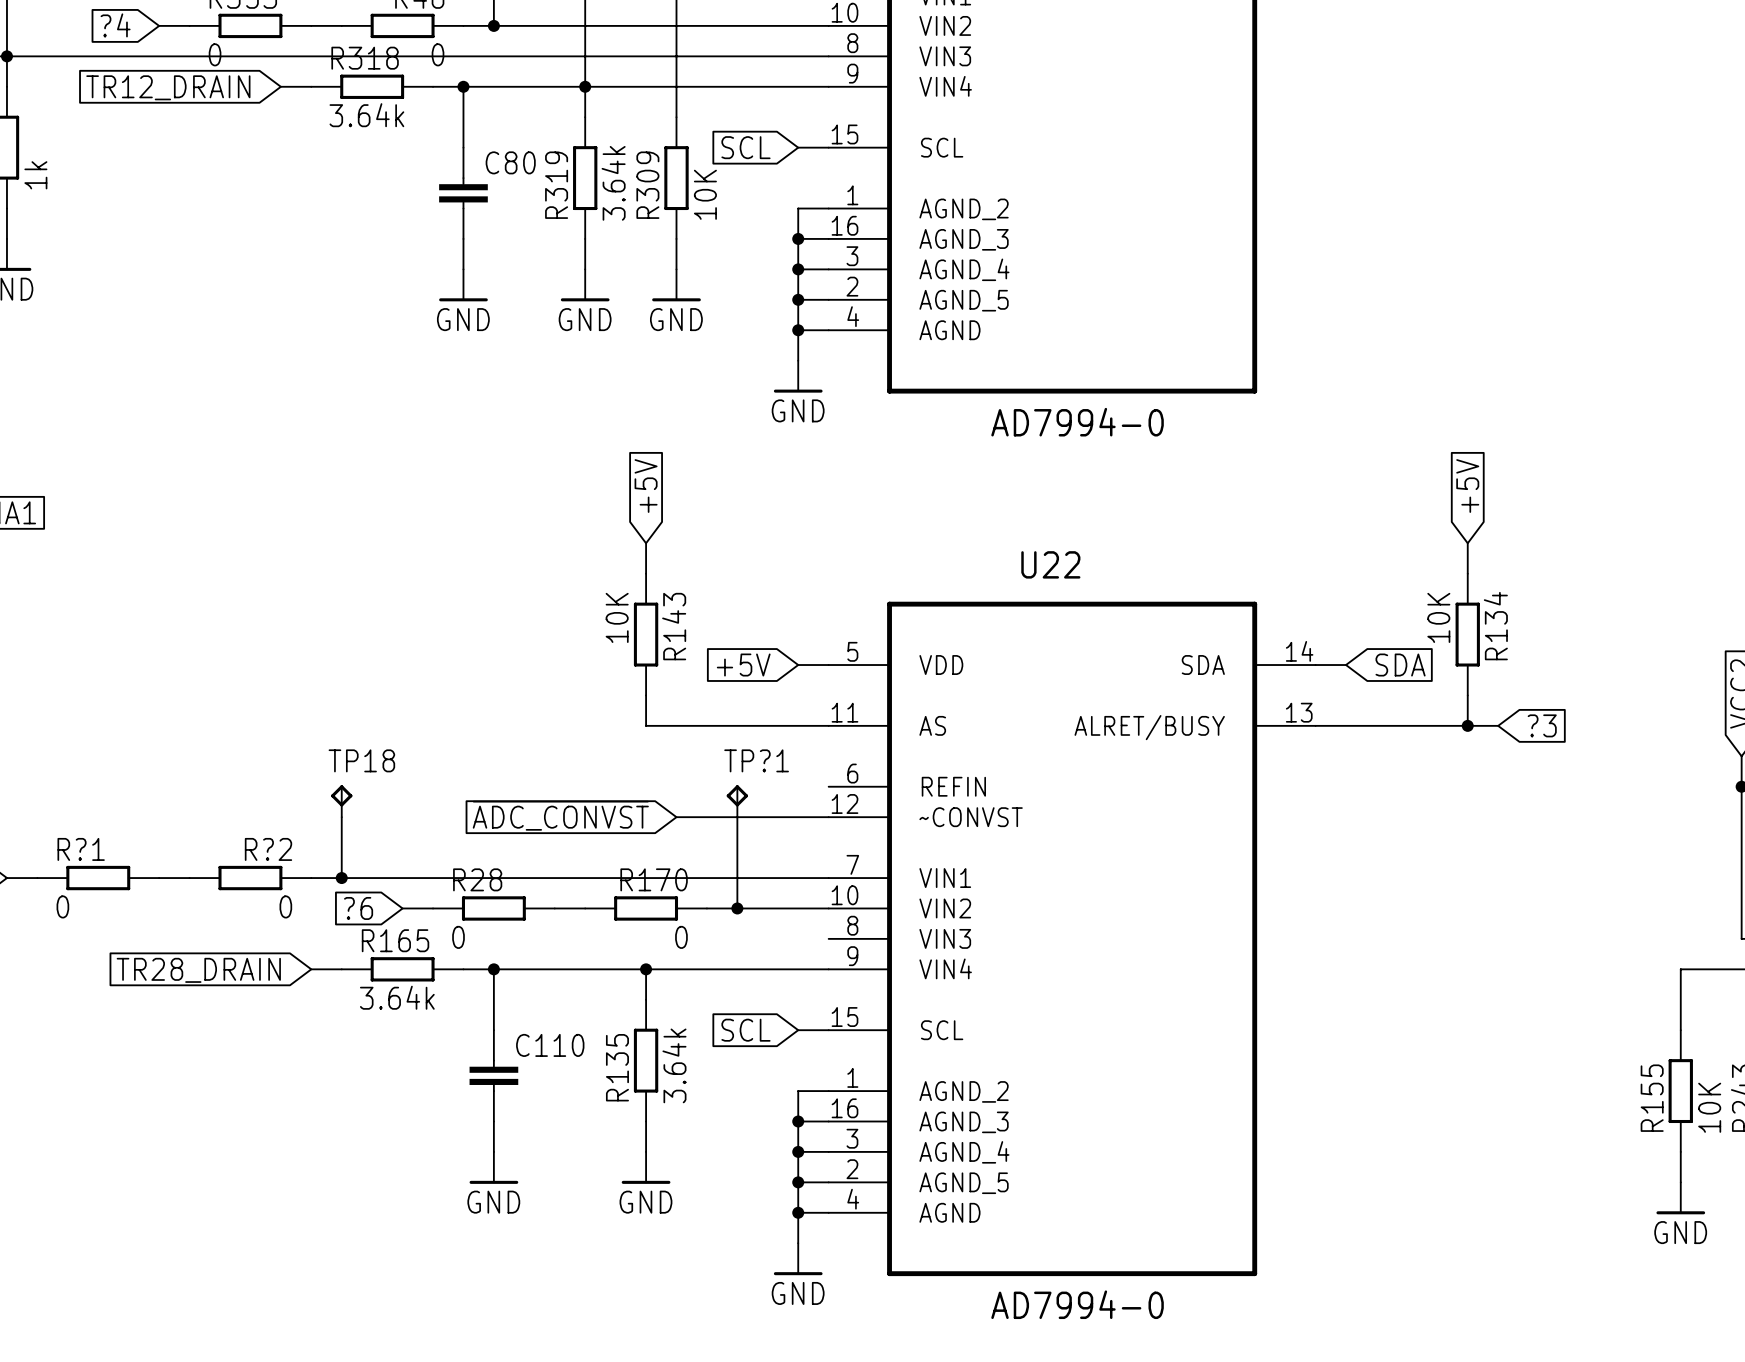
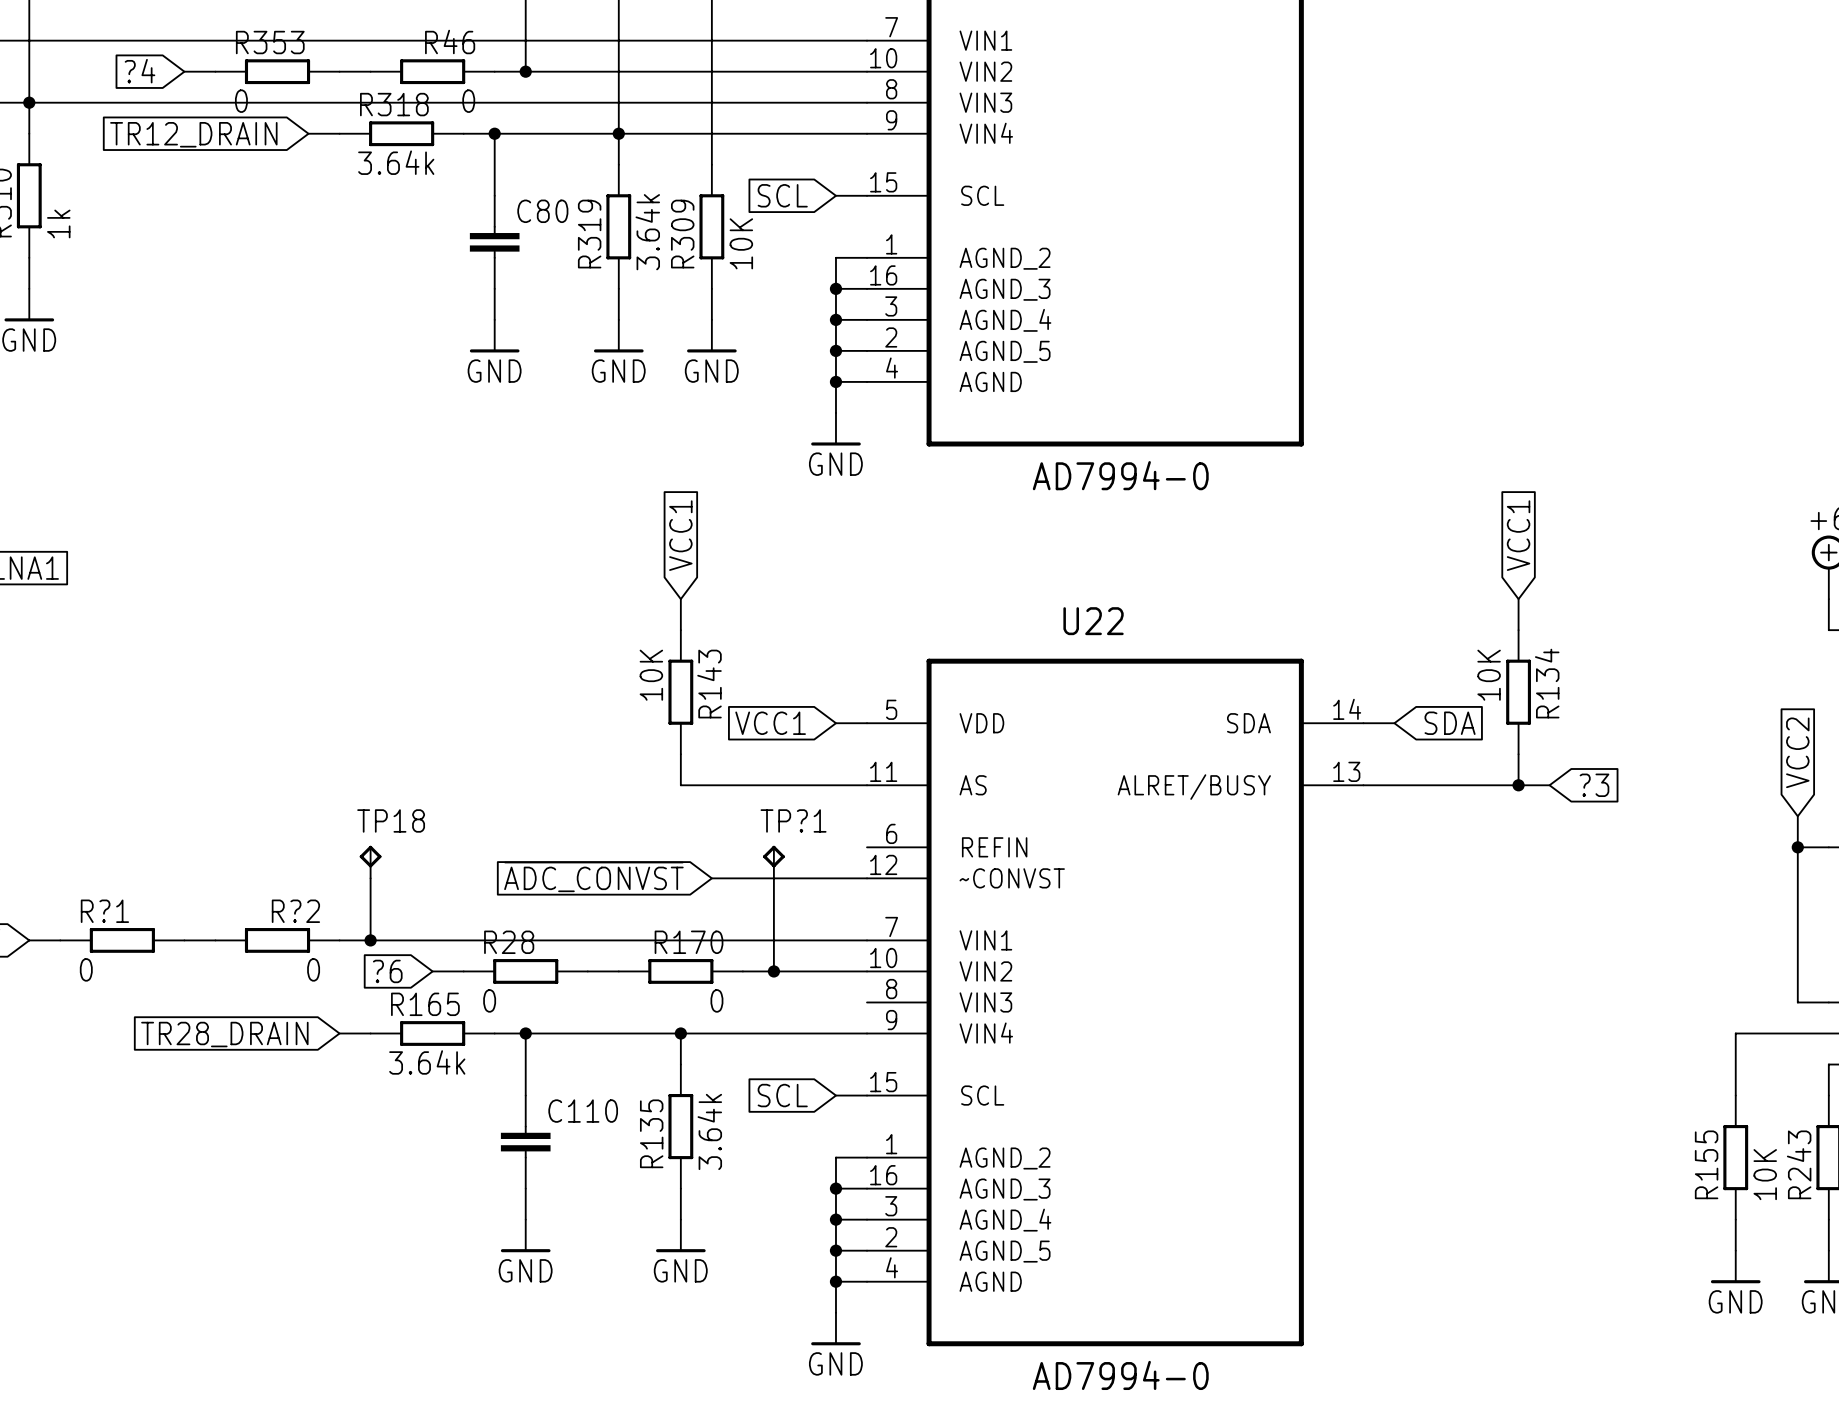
global label: +5V (646, 486) -> VCC1 (680, 535)
global label: +5V (1467, 486) -> VCC1 (1518, 535)
global label: +5V (743, 665) -> VCC1 (770, 723)

